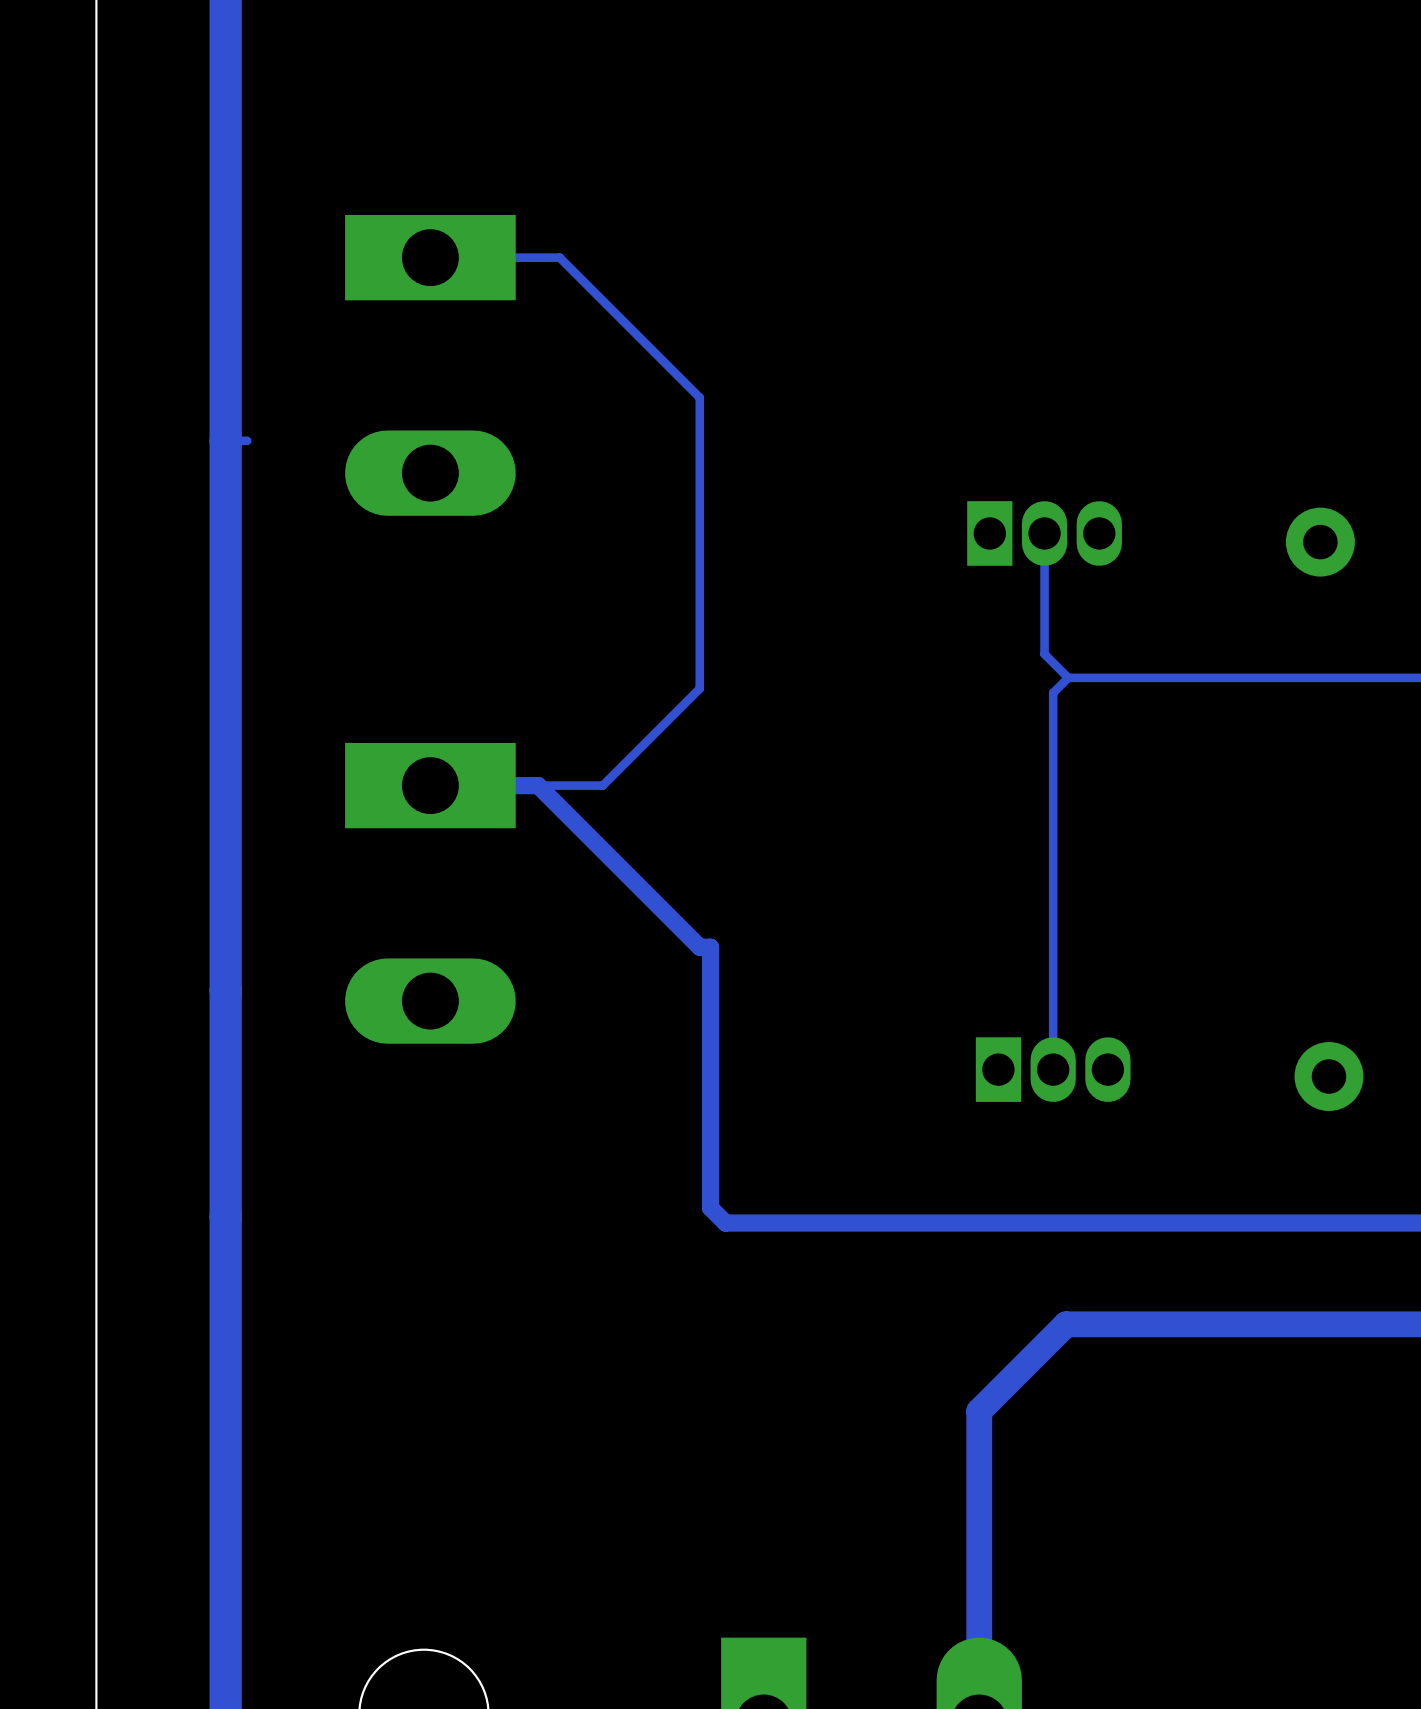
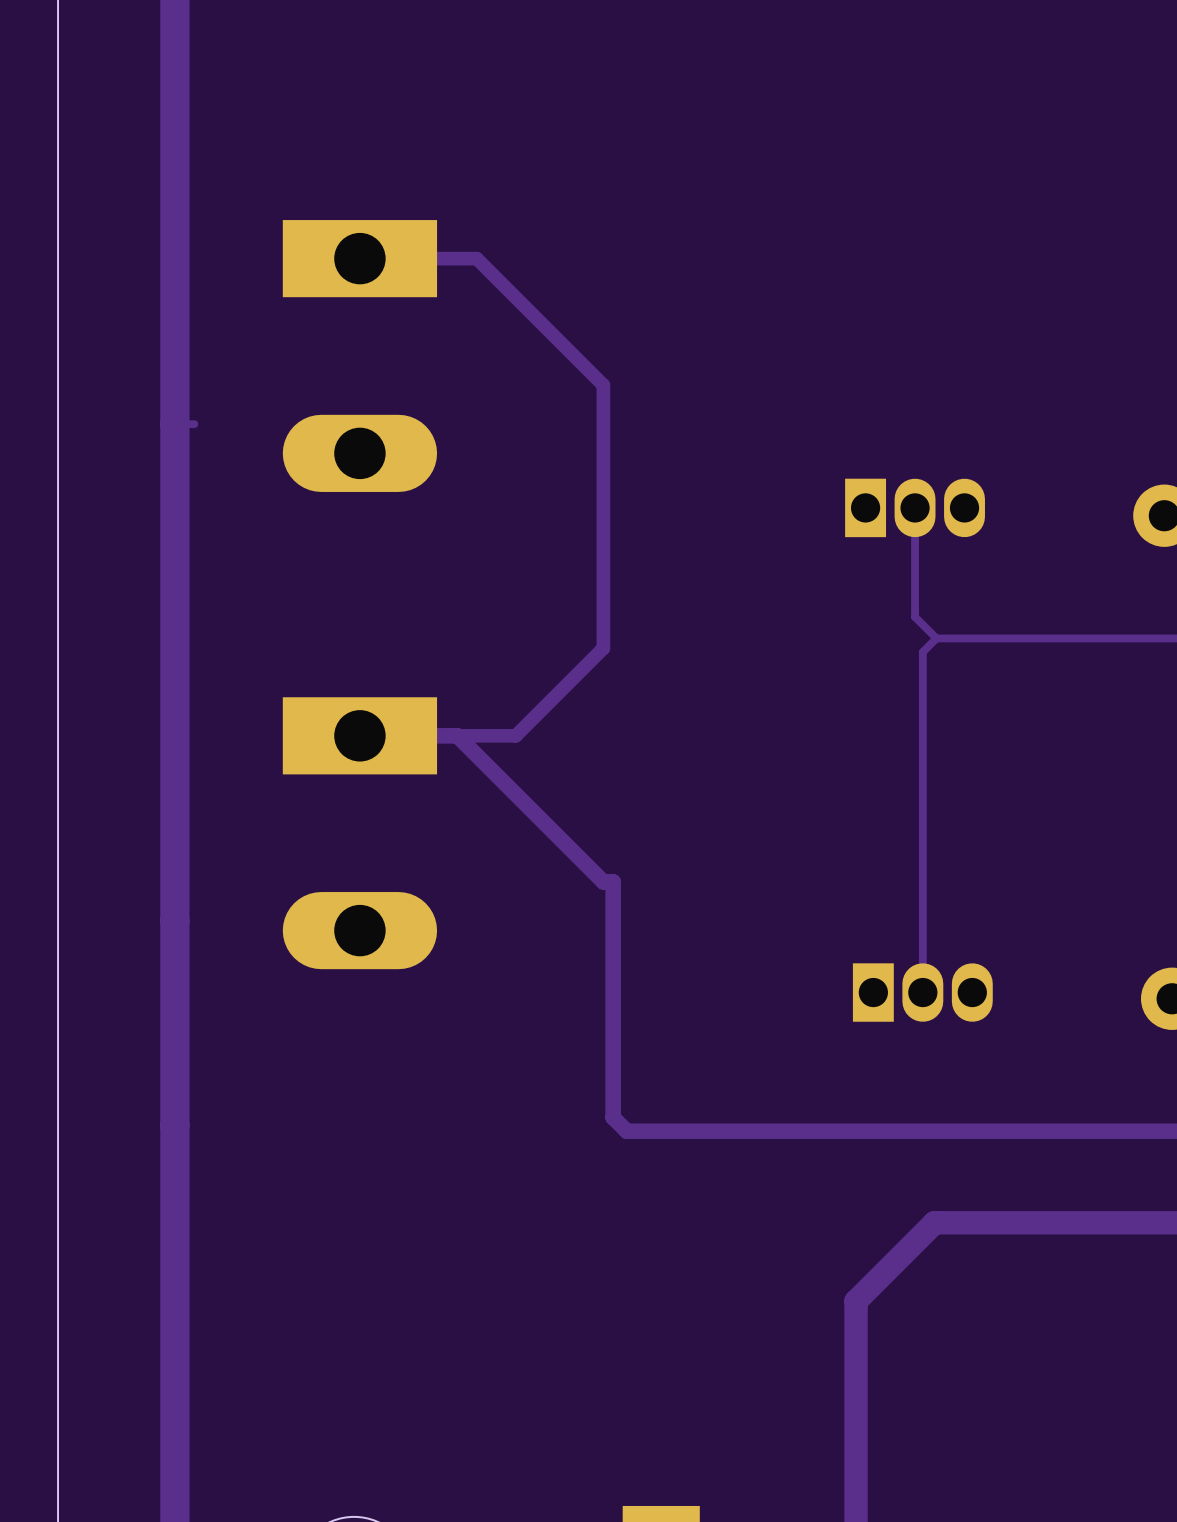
track width: thin (430, 257) (559, 257) (699, 397) (699, 688) (602, 785) (430, 785) -> thick (359, 258) (476, 258) (603, 385) (603, 648) (515, 735) (359, 735)

